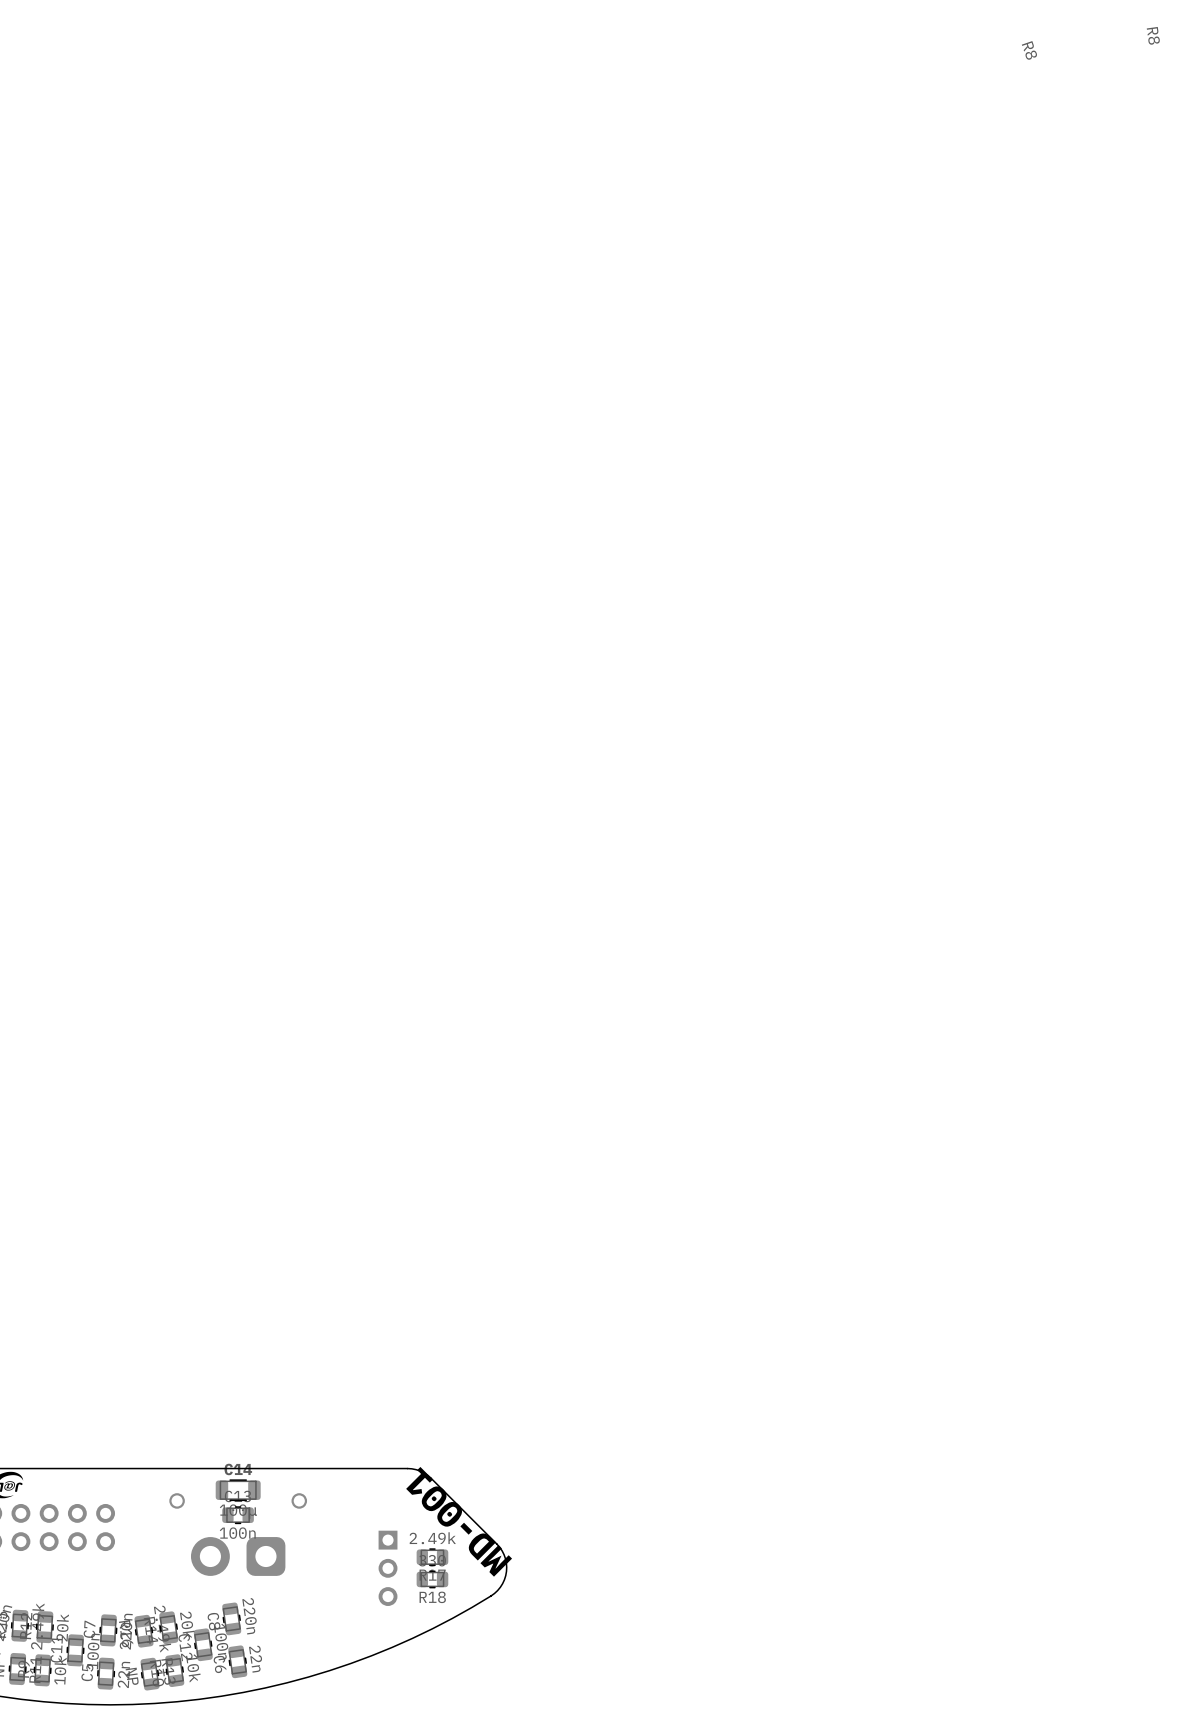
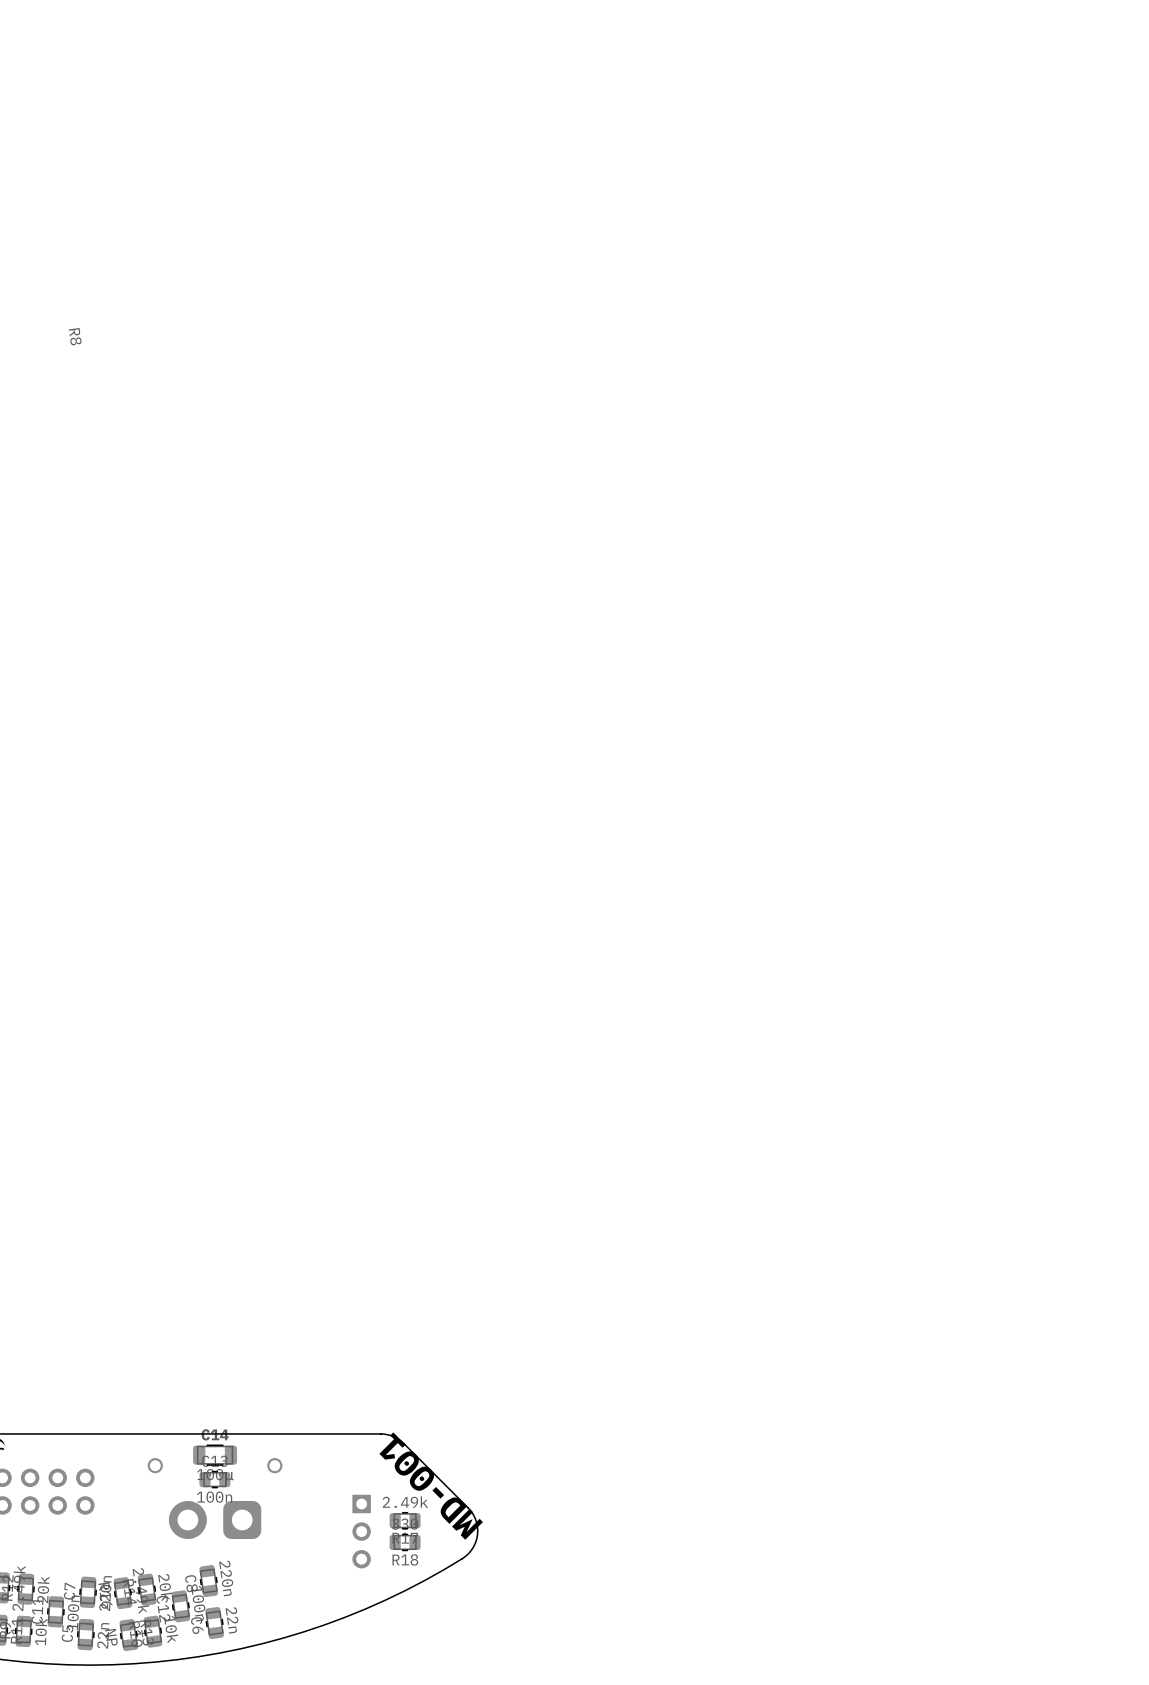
text: R8 (1153, 35) -> none
text: R8 (1029, 50) -> none
text: none -> R8 (75, 336)

